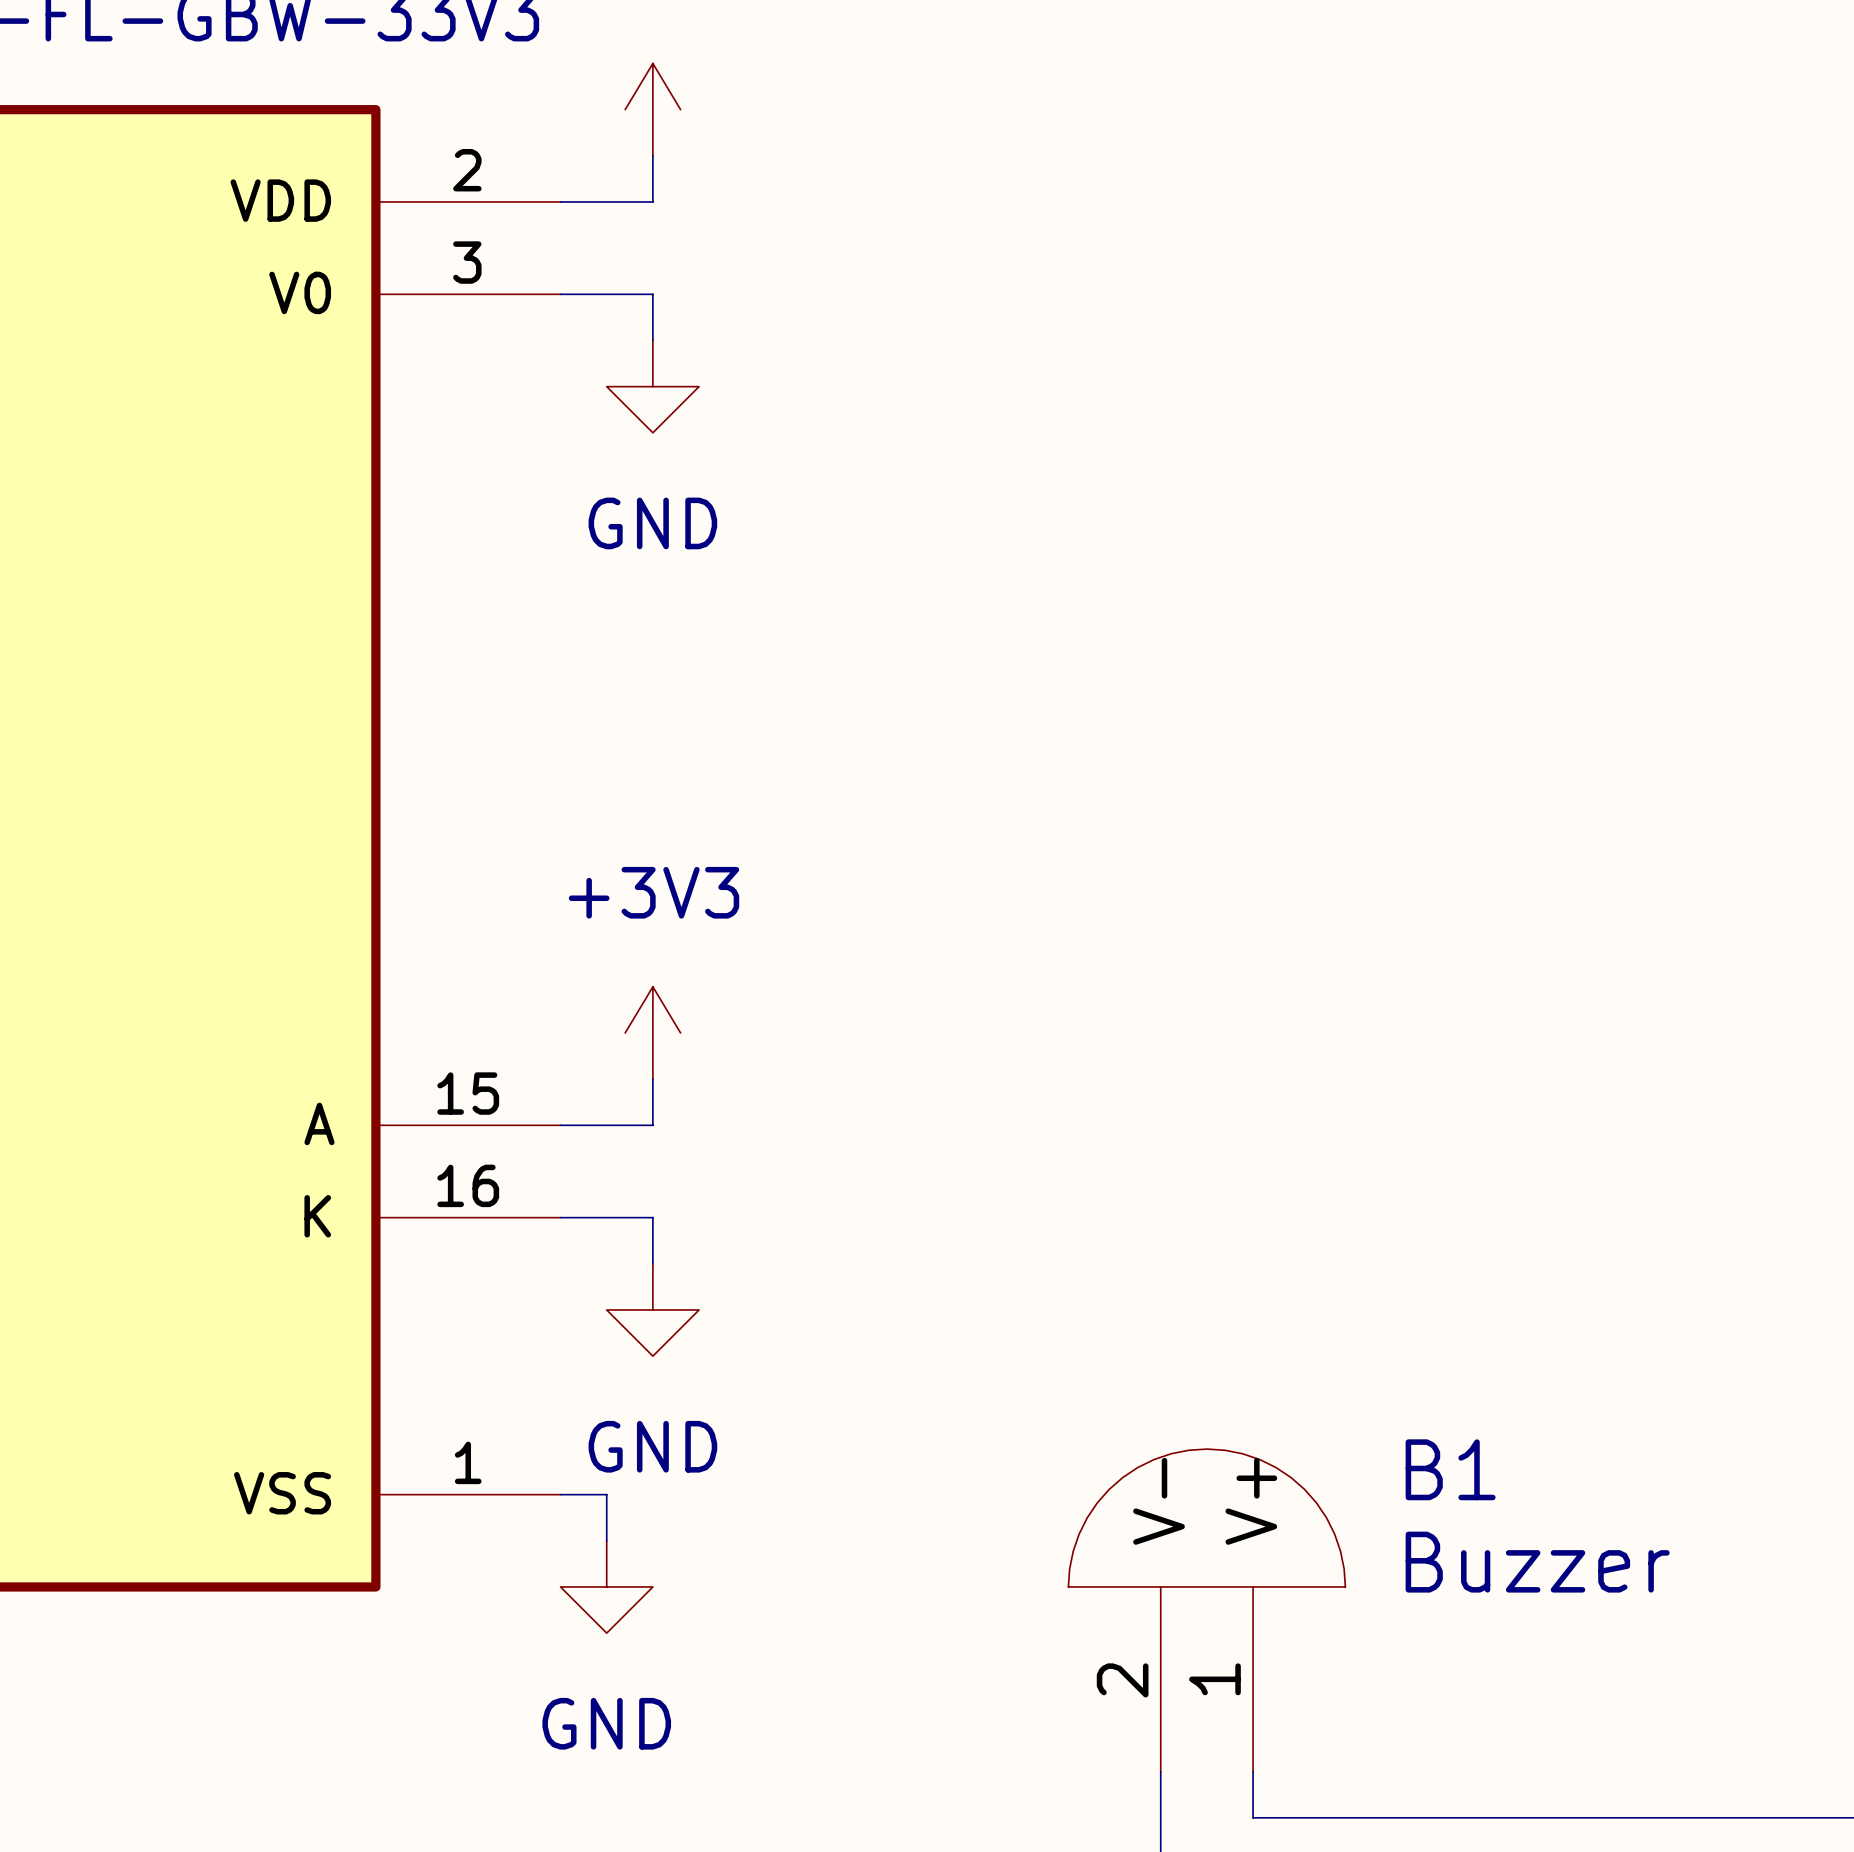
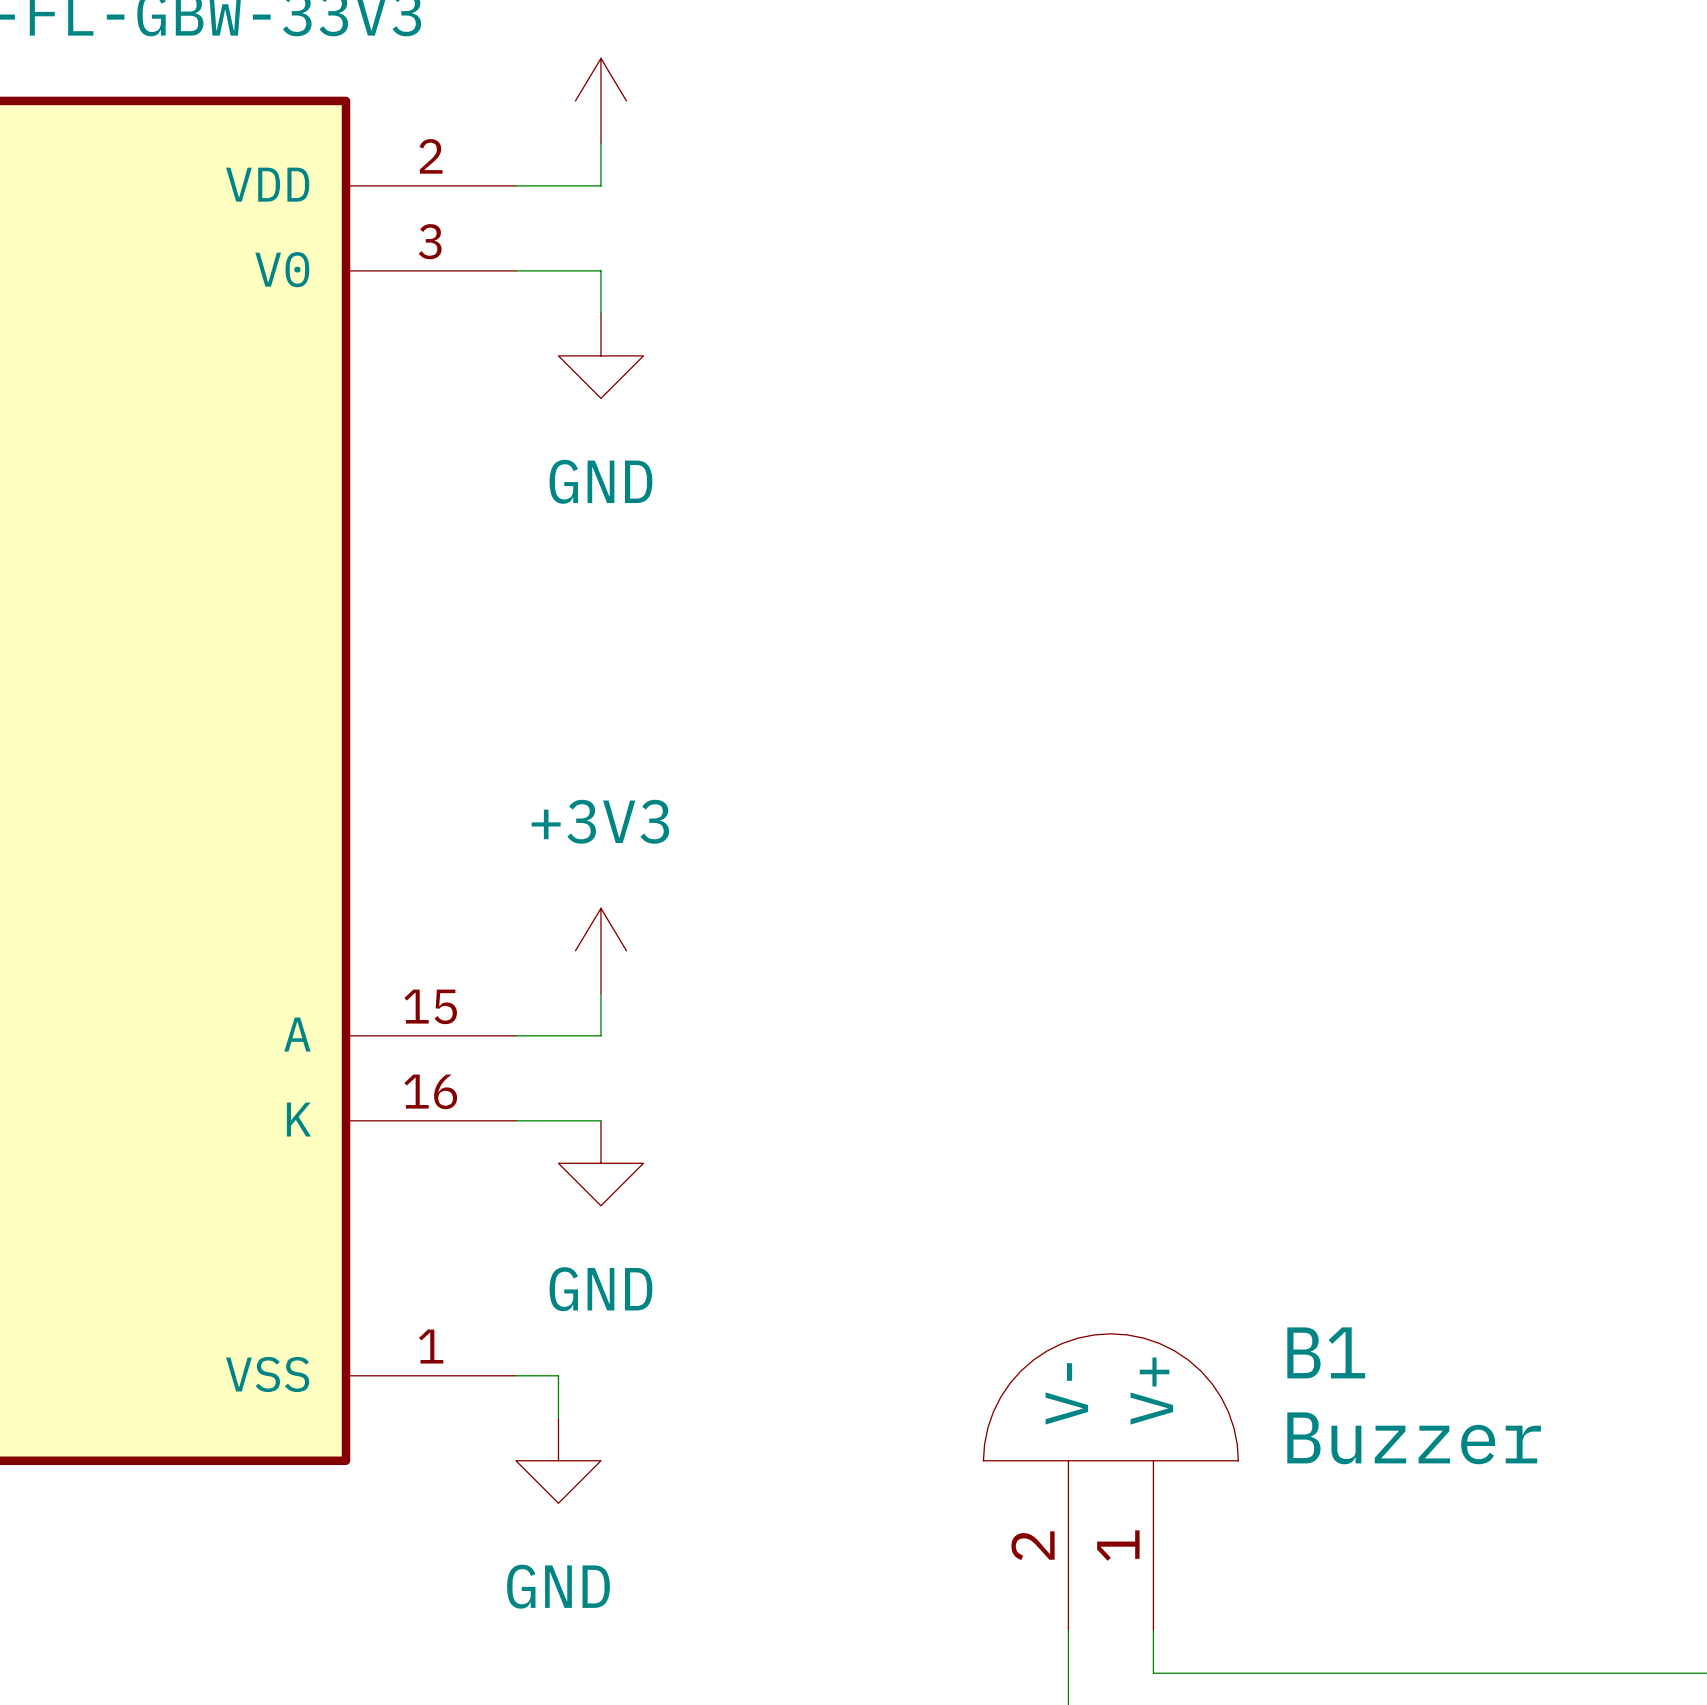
power symbol position: GND (652, 1309) -> GND (600, 1163)

